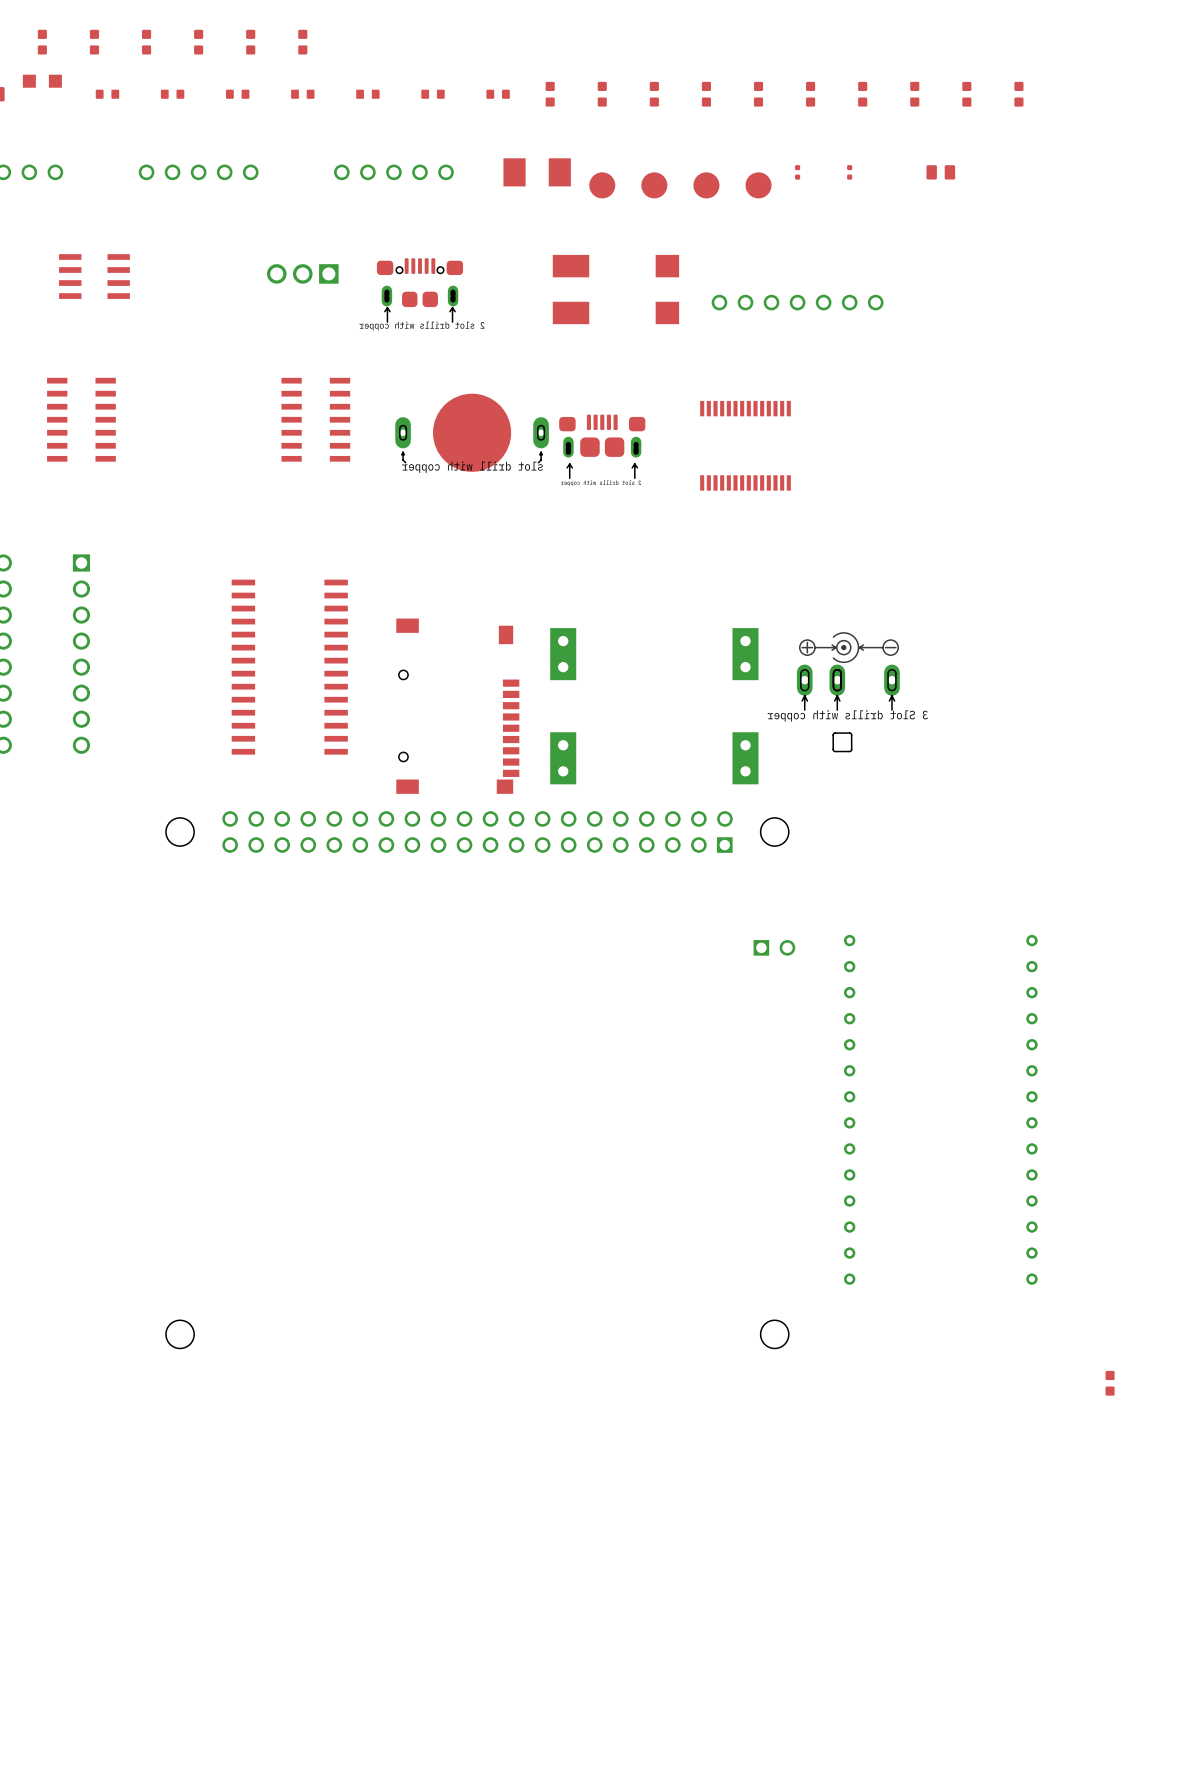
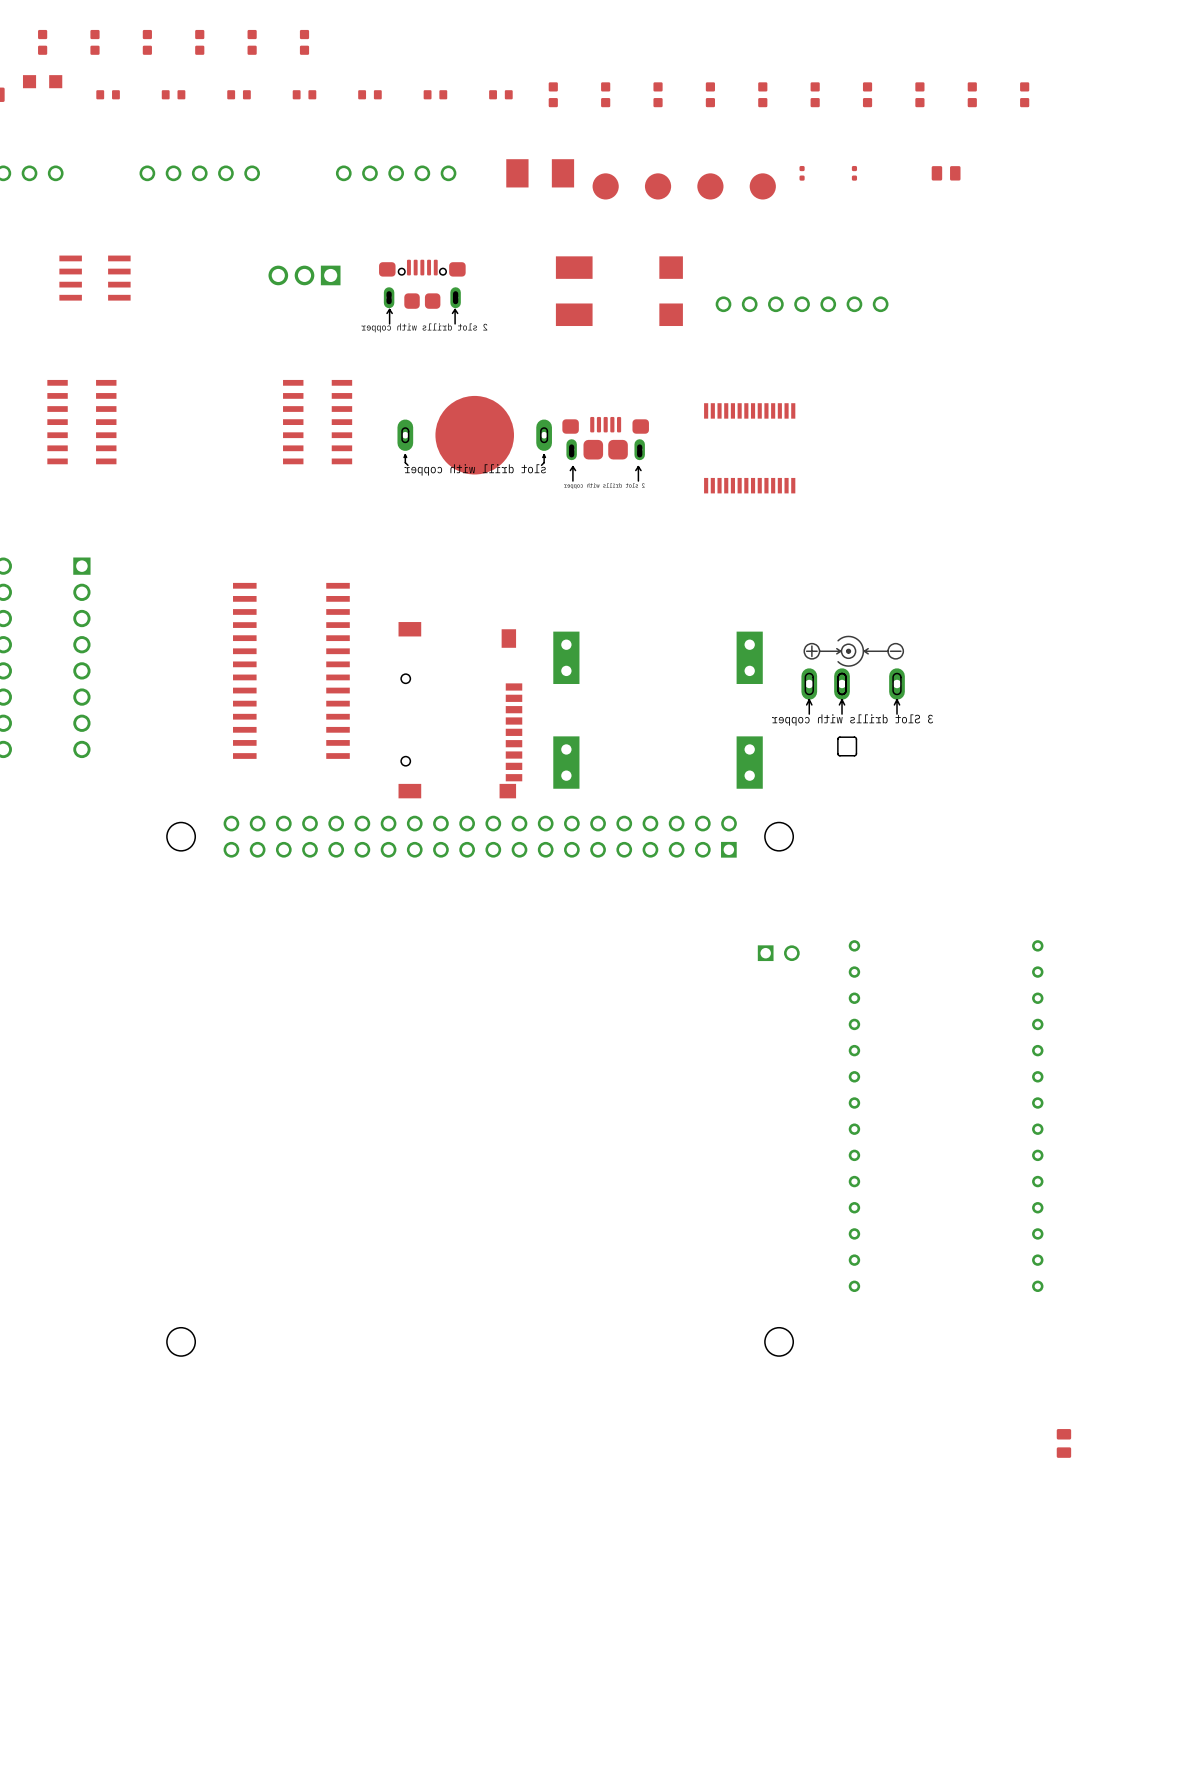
part: (1110, 1383) -> none
part: none -> (1063, 1443)

